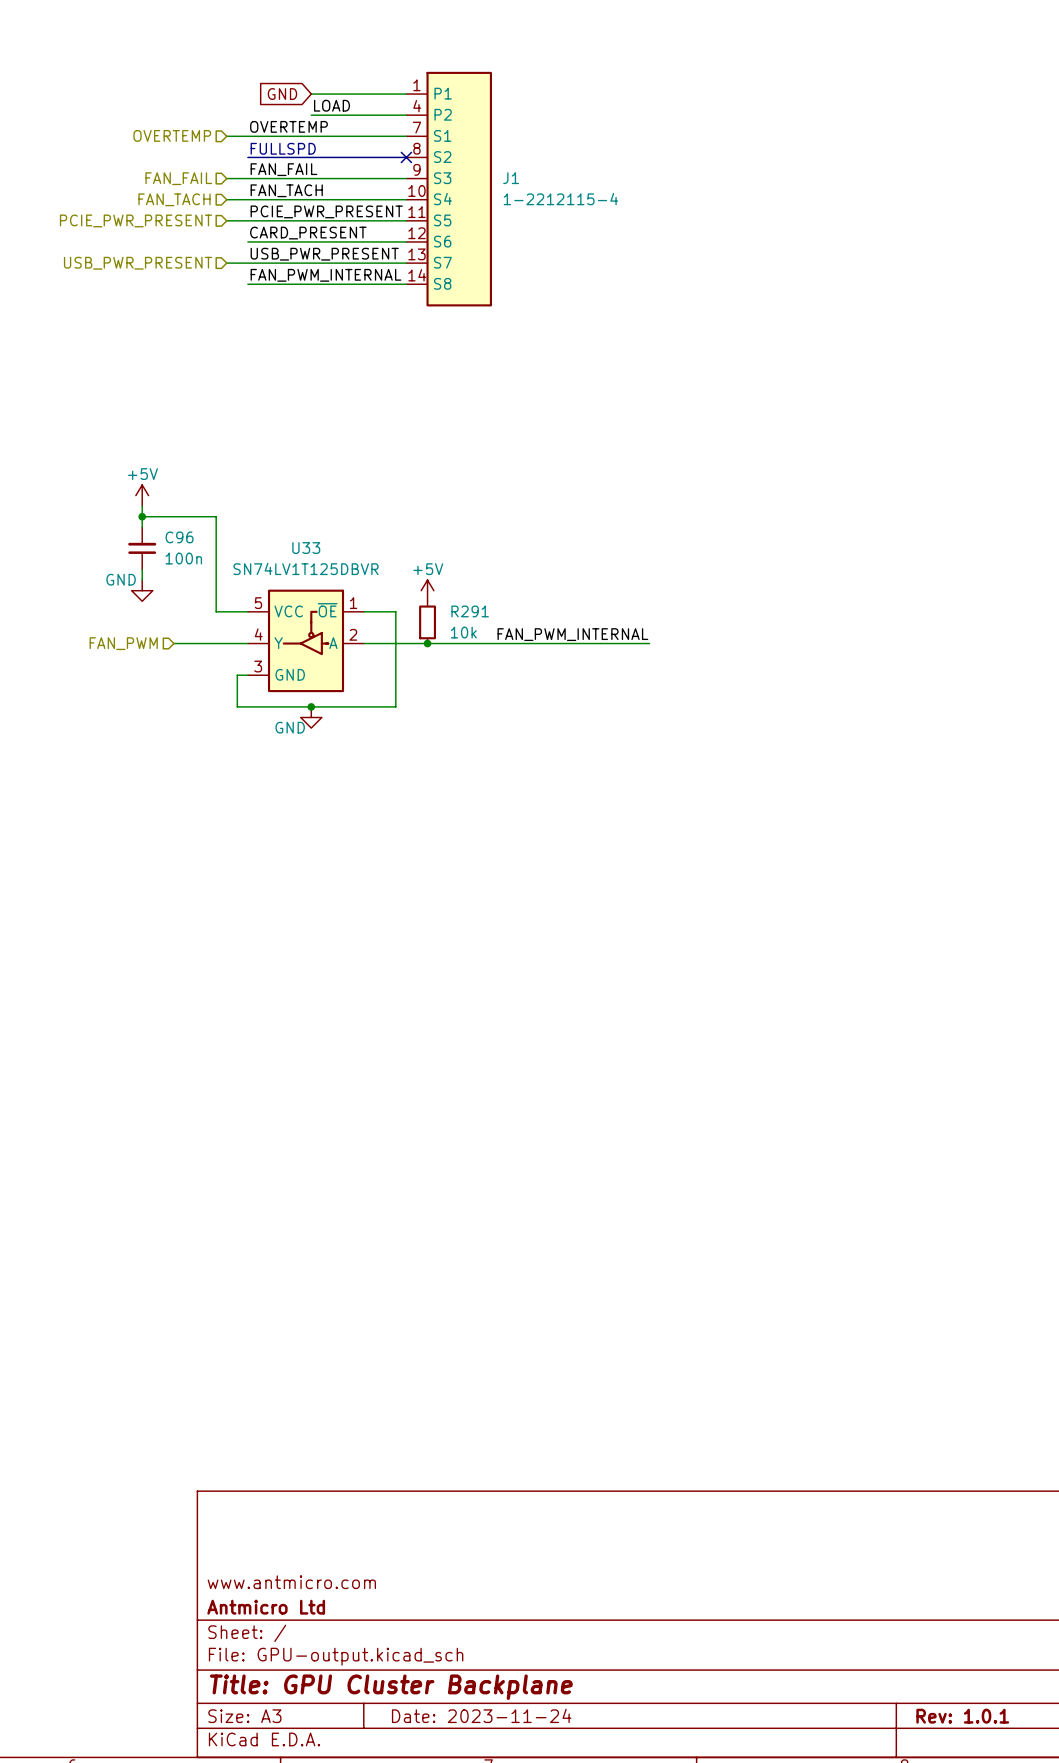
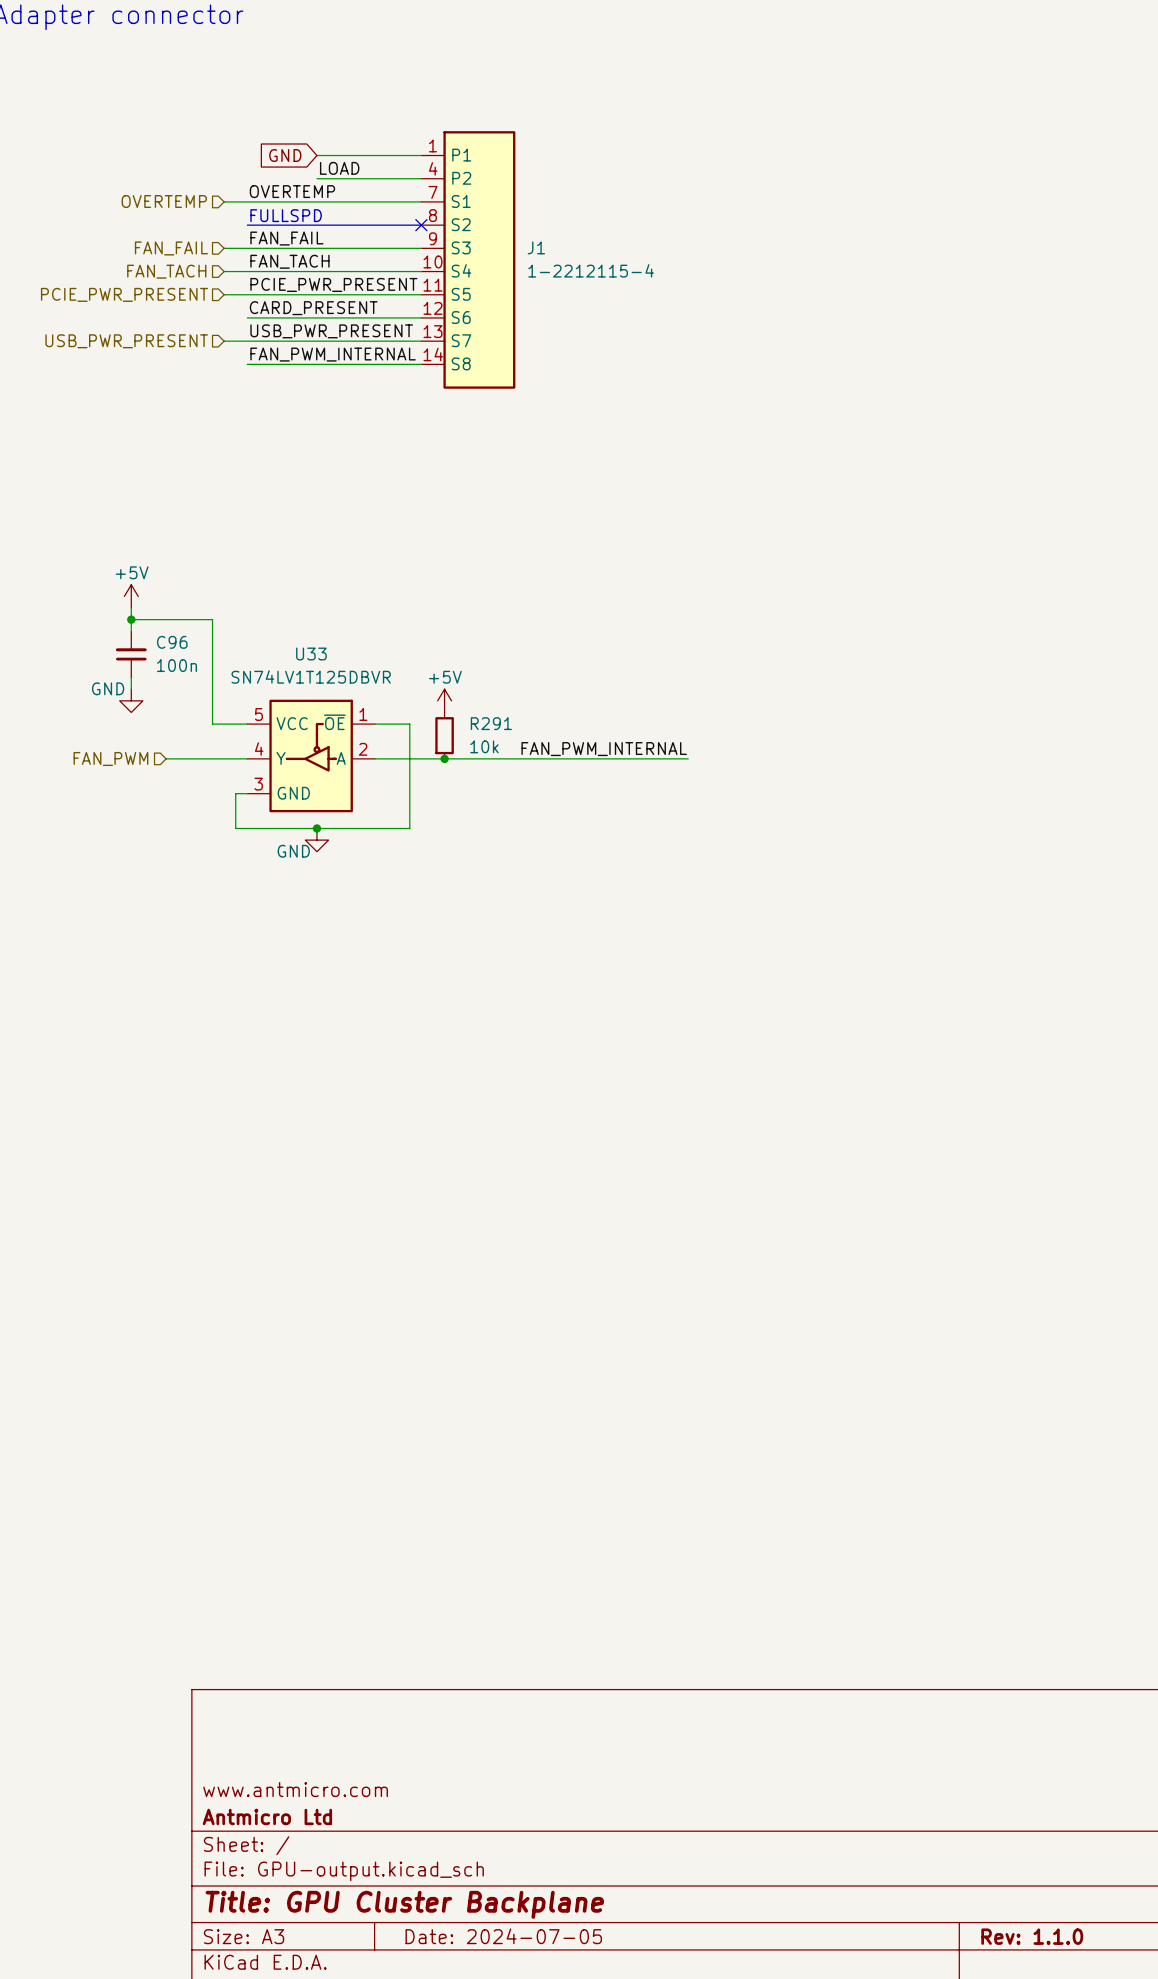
title block: Date: 2023-11-24 (481, 1715) -> Date: 2024-07-05 (503, 1936)
title block: Rev: 1.0.1 (962, 1716) -> Rev: 1.1.0 (1032, 1936)

